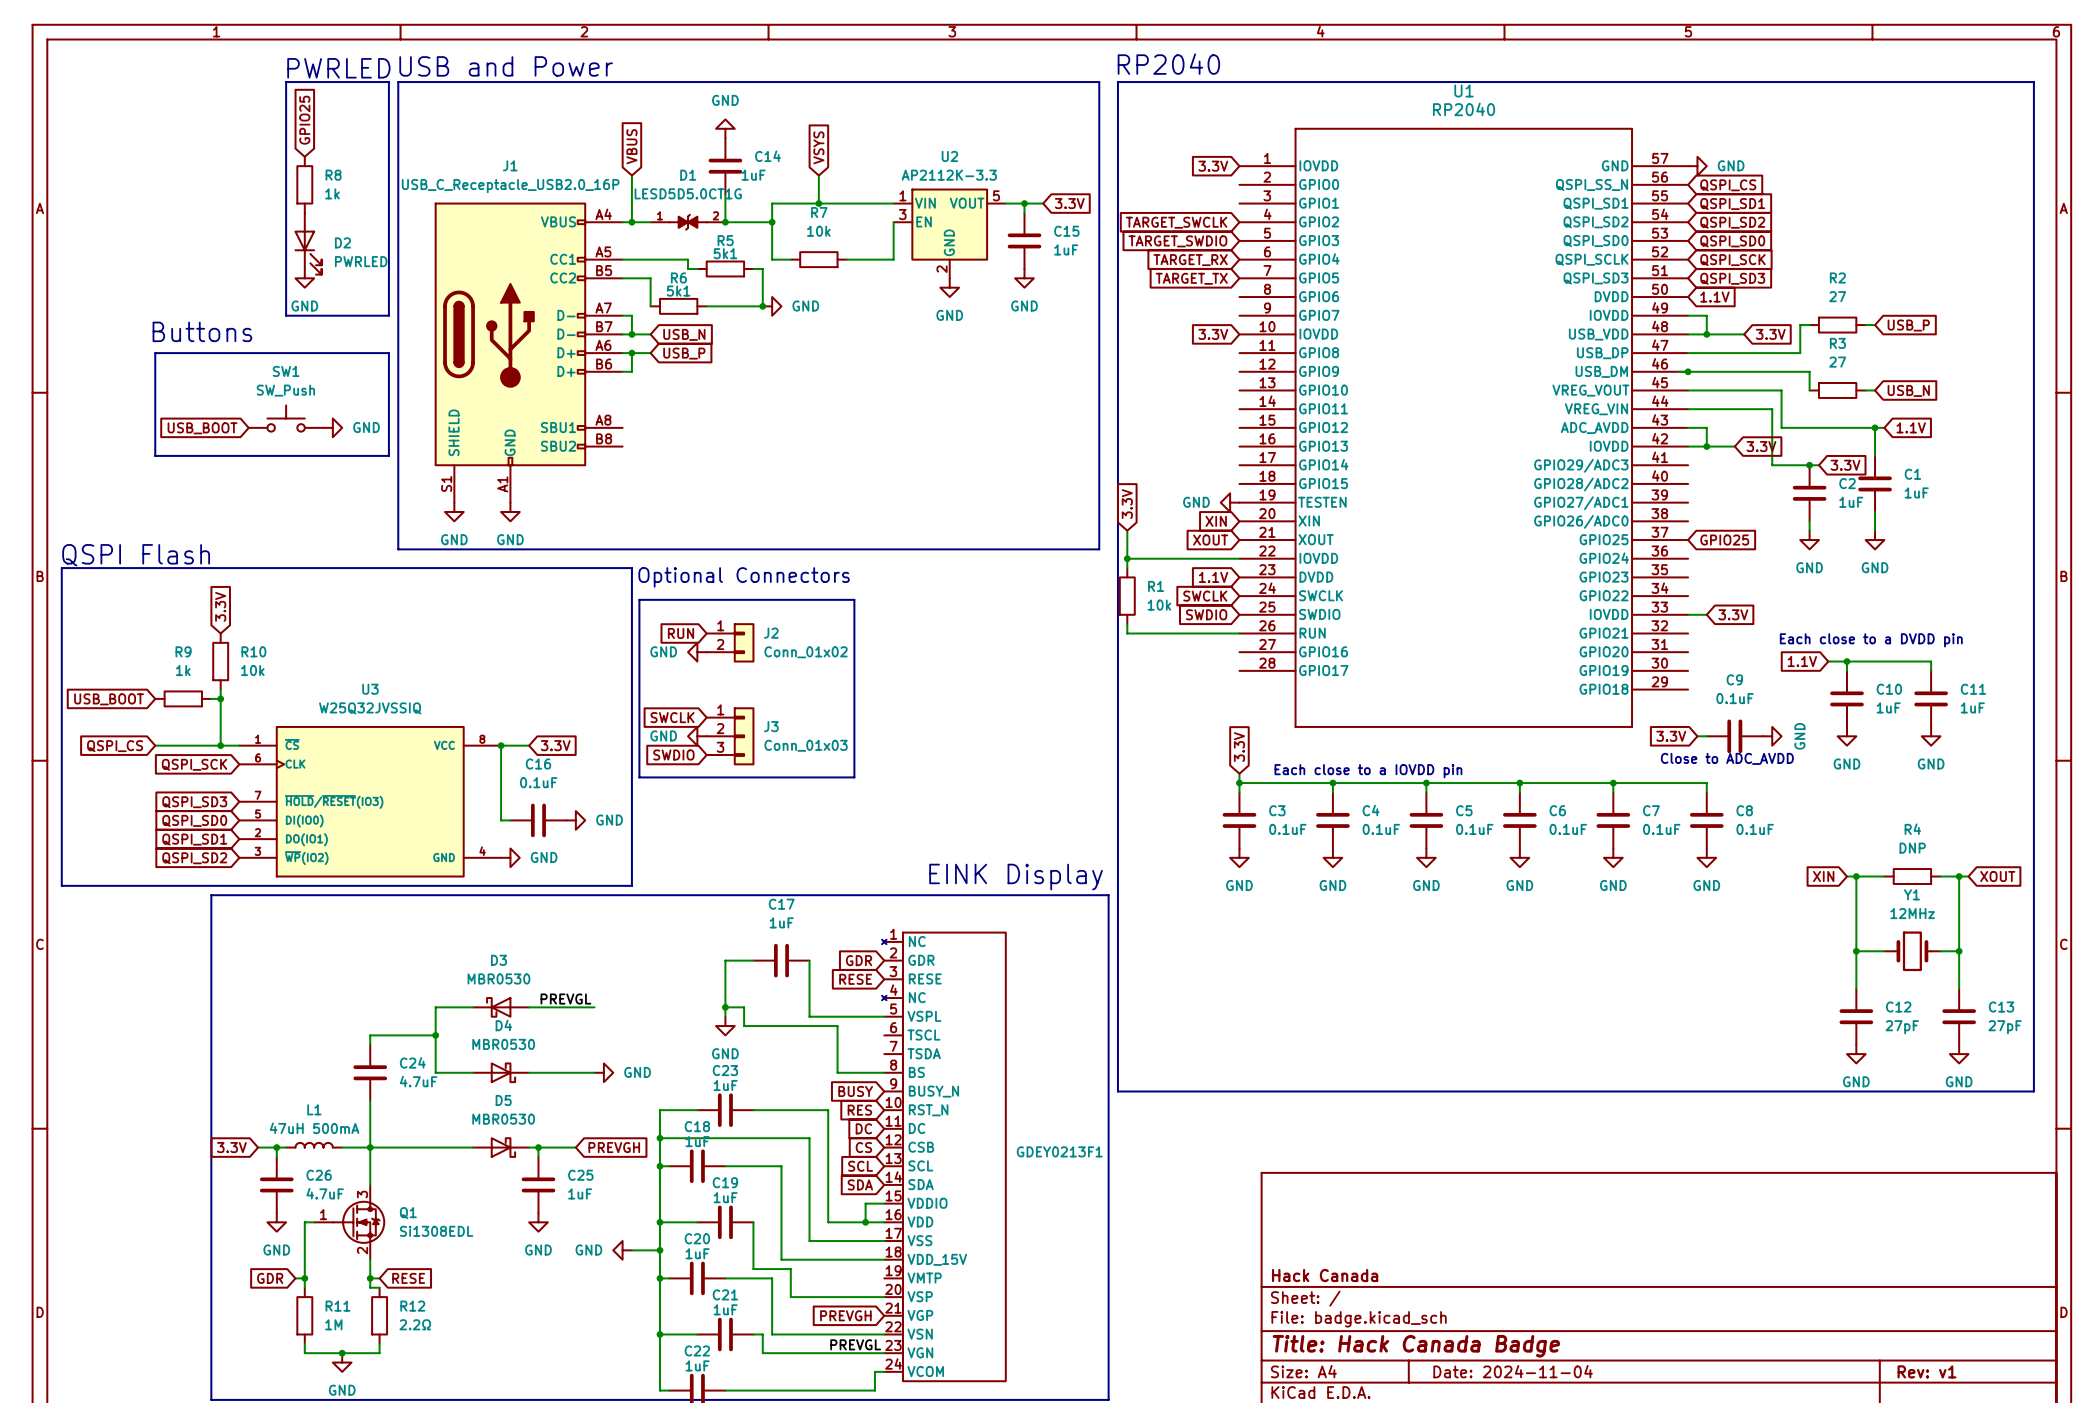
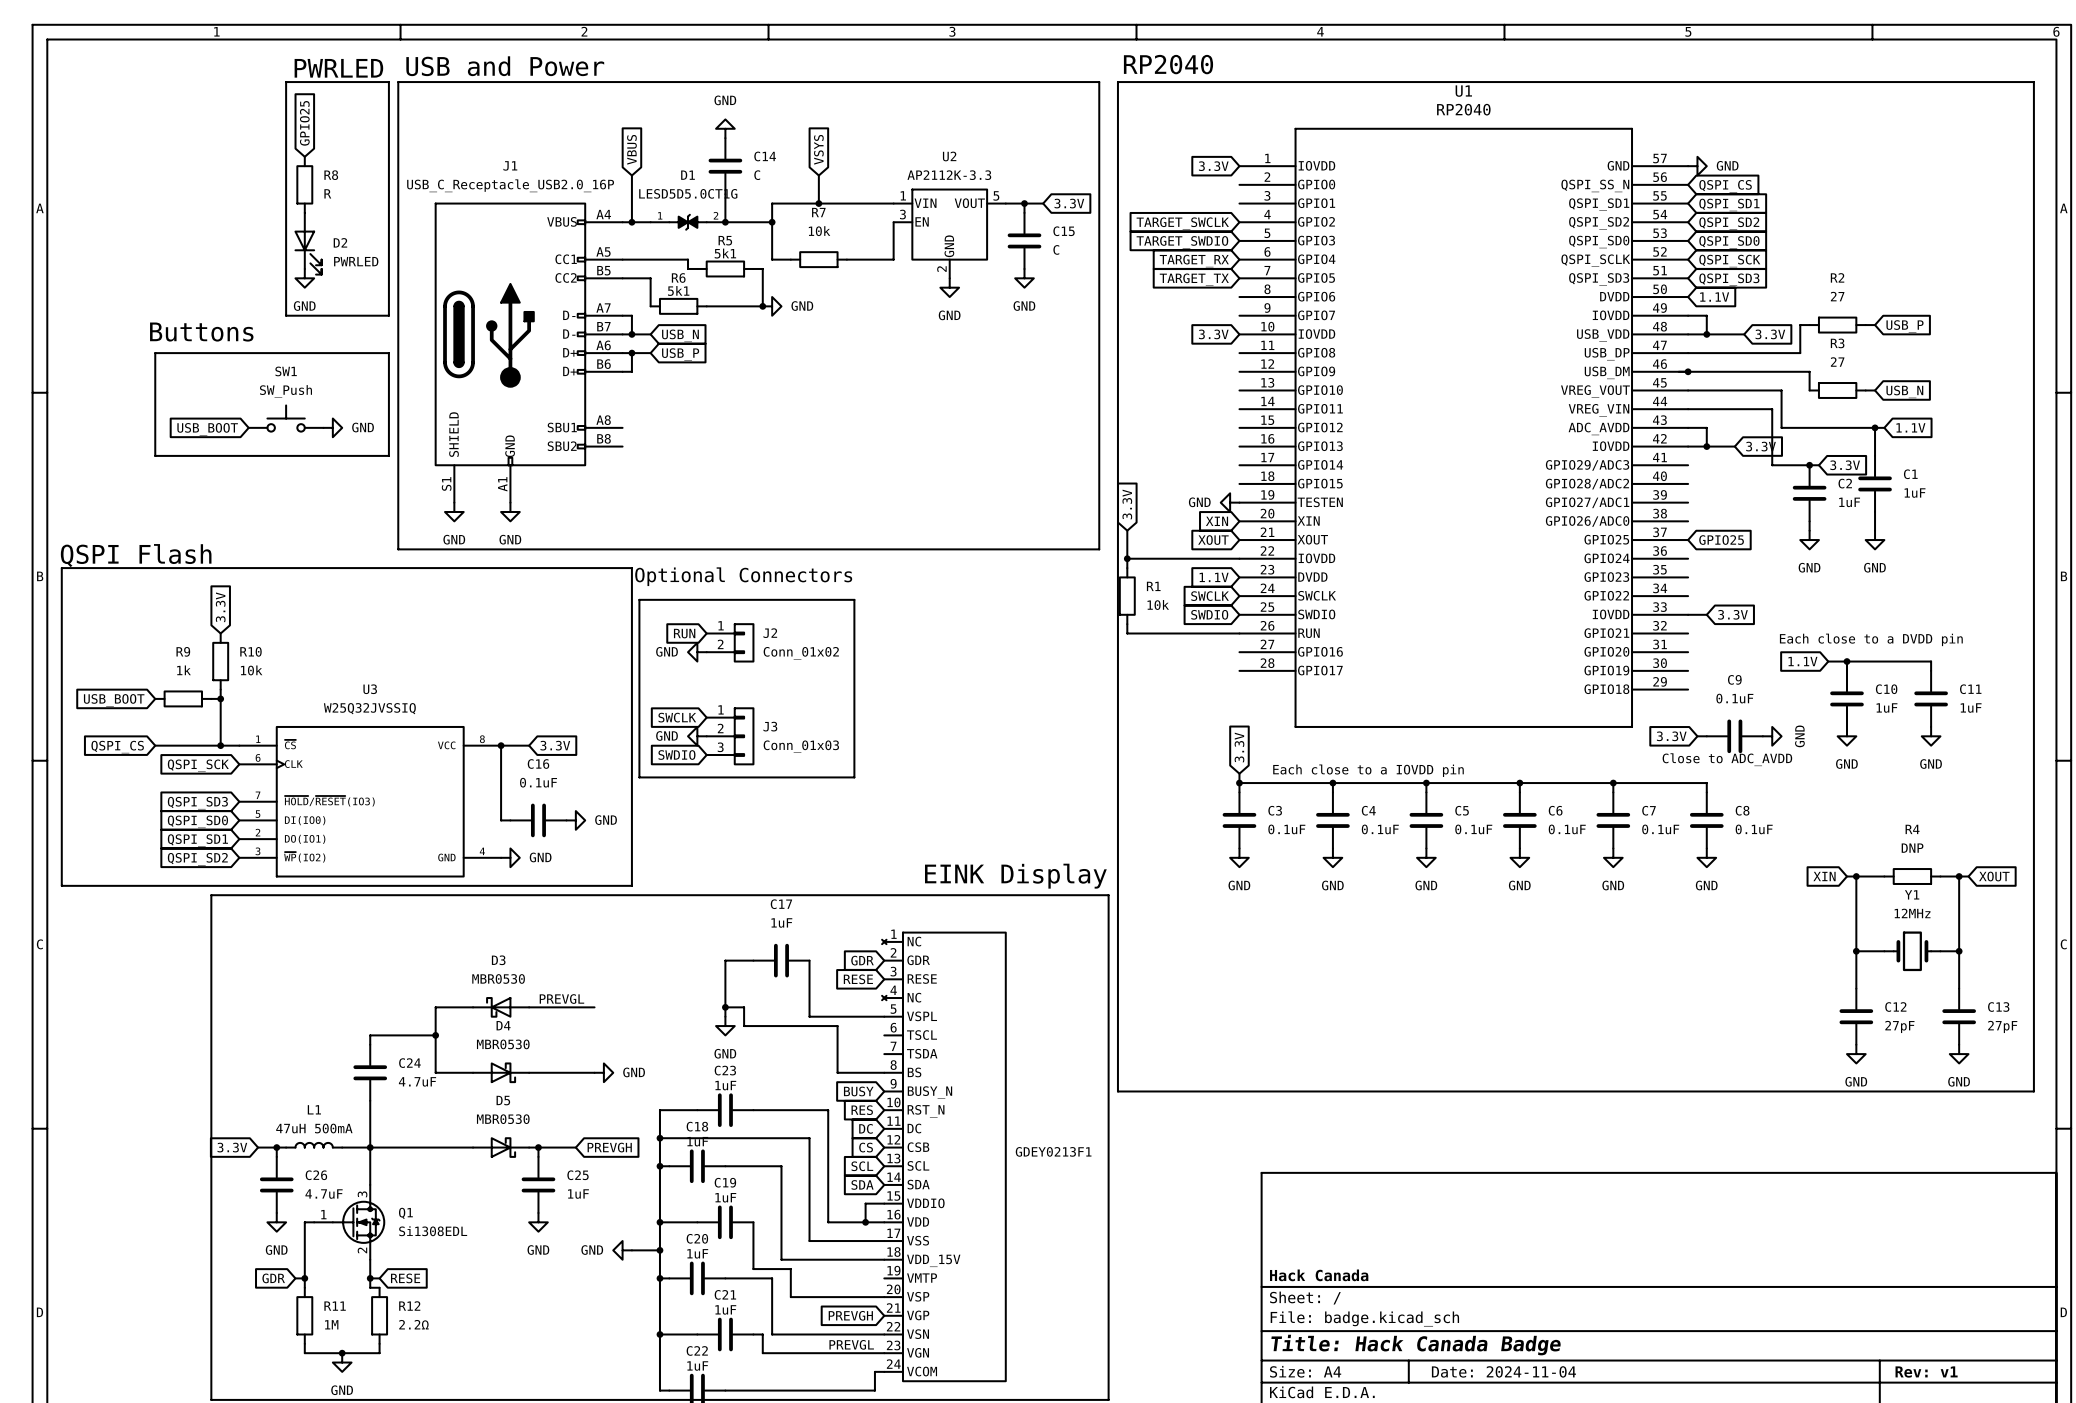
C14 value: 1uF (753, 175) -> C (757, 175)
R8 value: 1k (332, 193) -> R (327, 193)
C15 value: 1uF (1066, 249) -> C (1056, 249)

